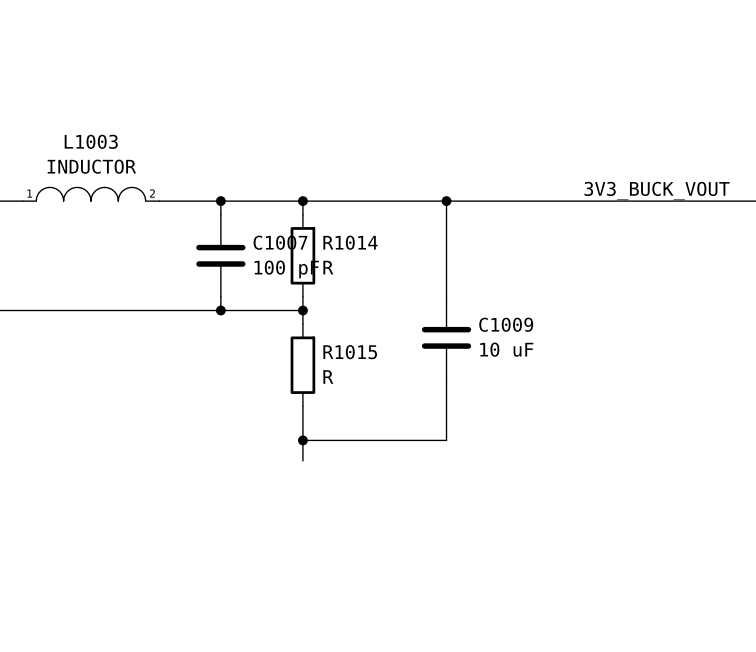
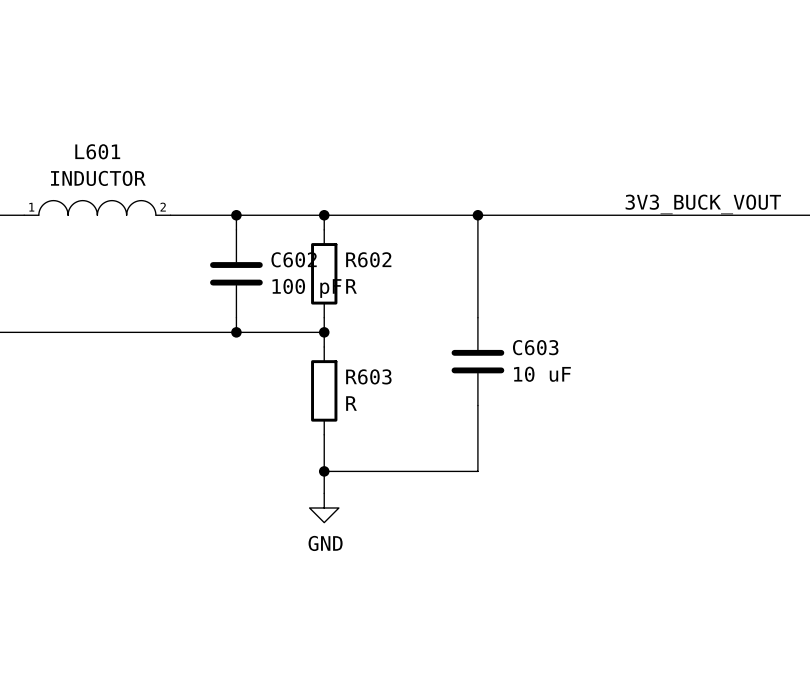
L1003 name: L1003 (91, 141) -> L601 (97, 151)
C1007 name: C1007 (280, 242) -> C602 (294, 259)
R1014 name: R1014 (350, 242) -> R602 (368, 259)
C1009 name: C1009 (506, 324) -> C603 (535, 347)
R1015 name: R1015 (350, 352) -> R603 (368, 376)
power symbol: none -> GND (324, 508)

